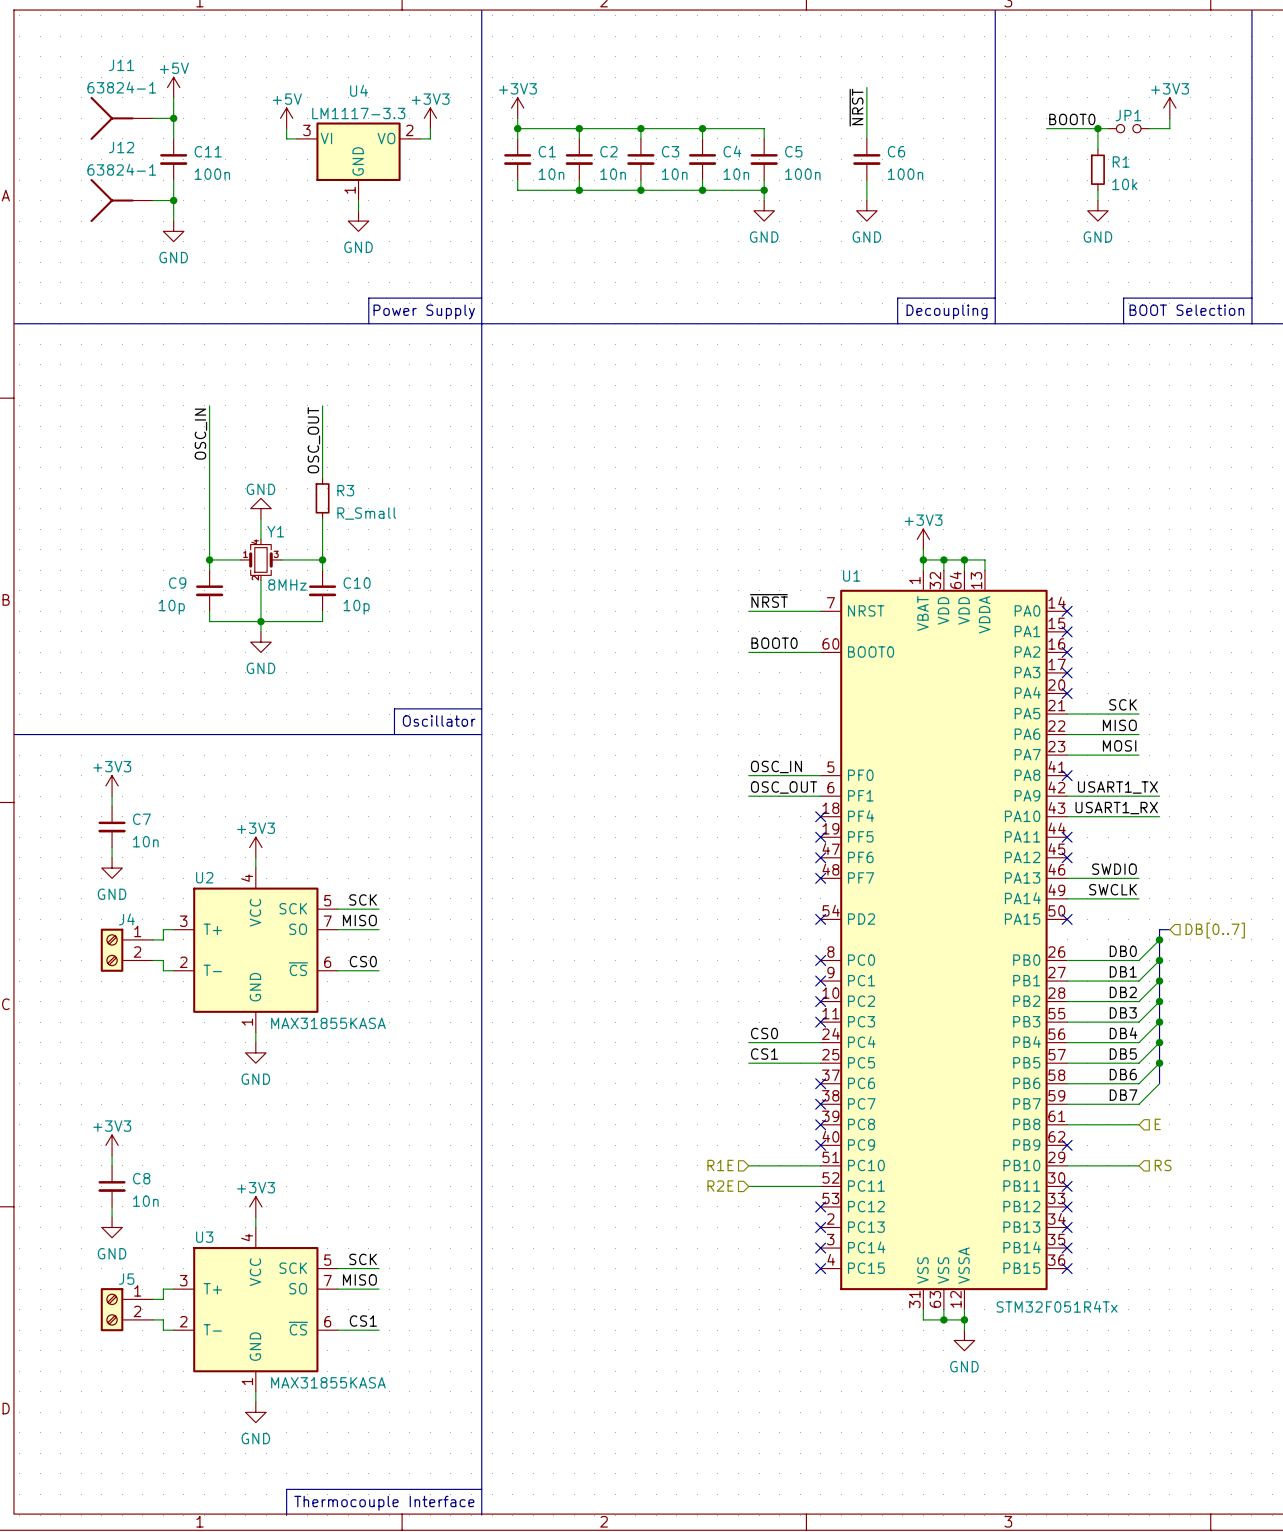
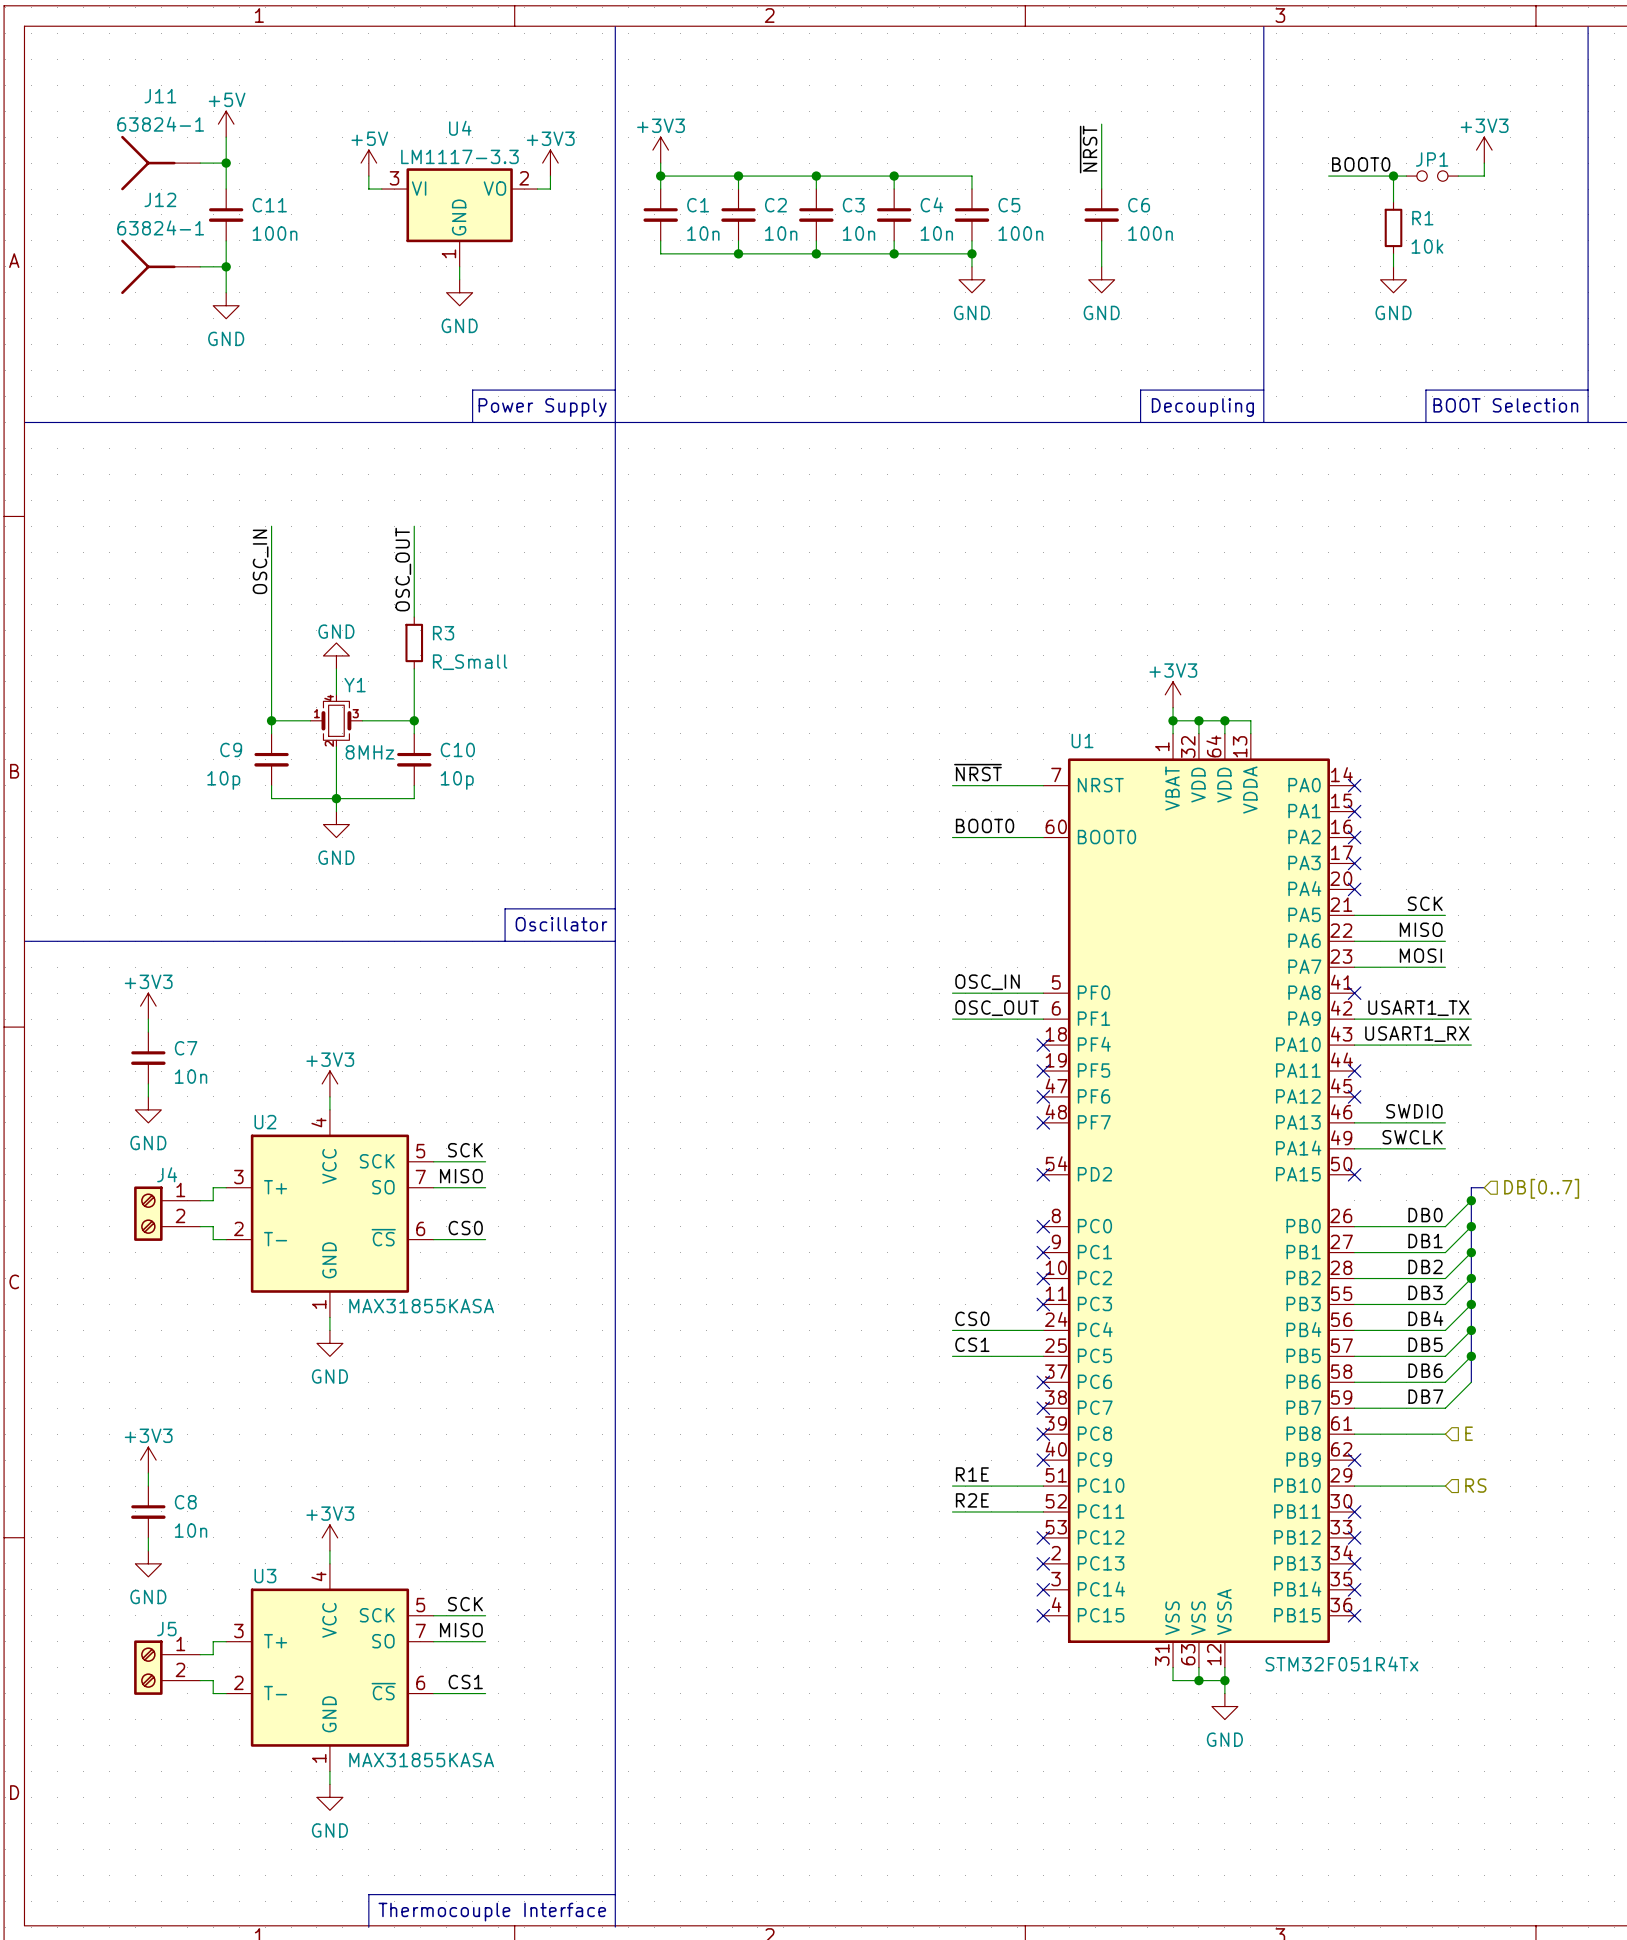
label: none -> R1E (972, 1474)
hierarchical label: R1E (720, 1165) -> none
label: none -> R2E (972, 1500)
hierarchical label: R2E (720, 1186) -> none

